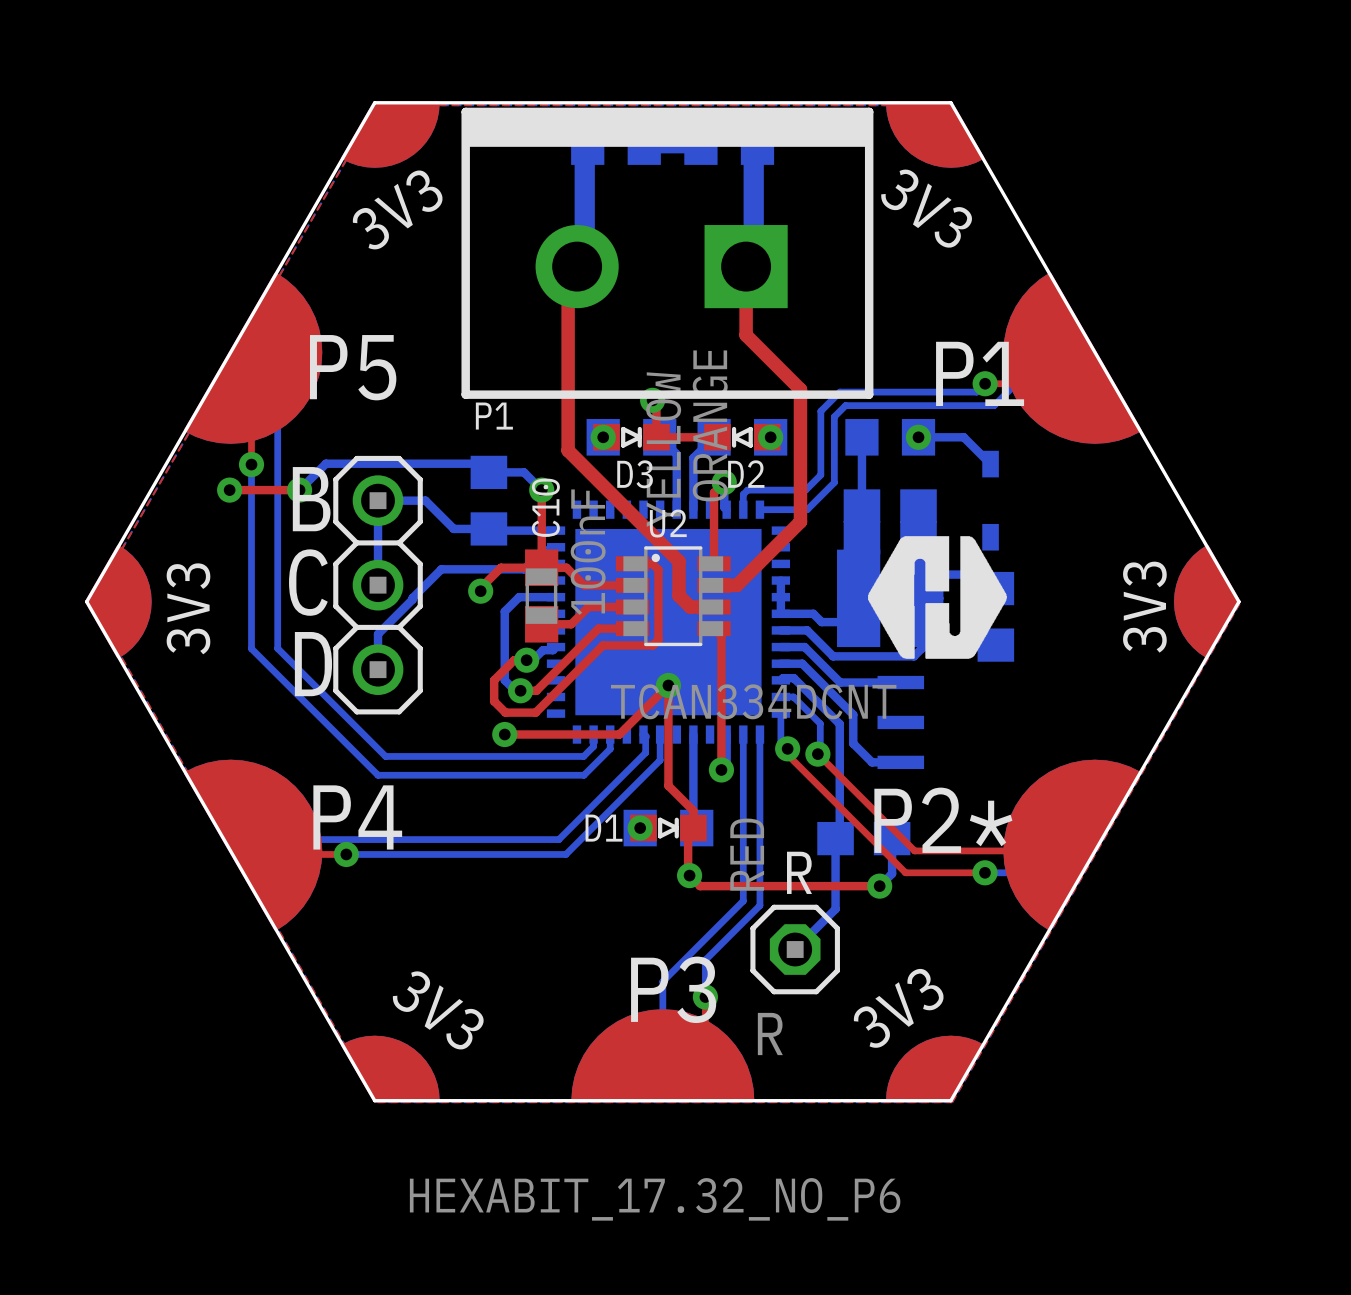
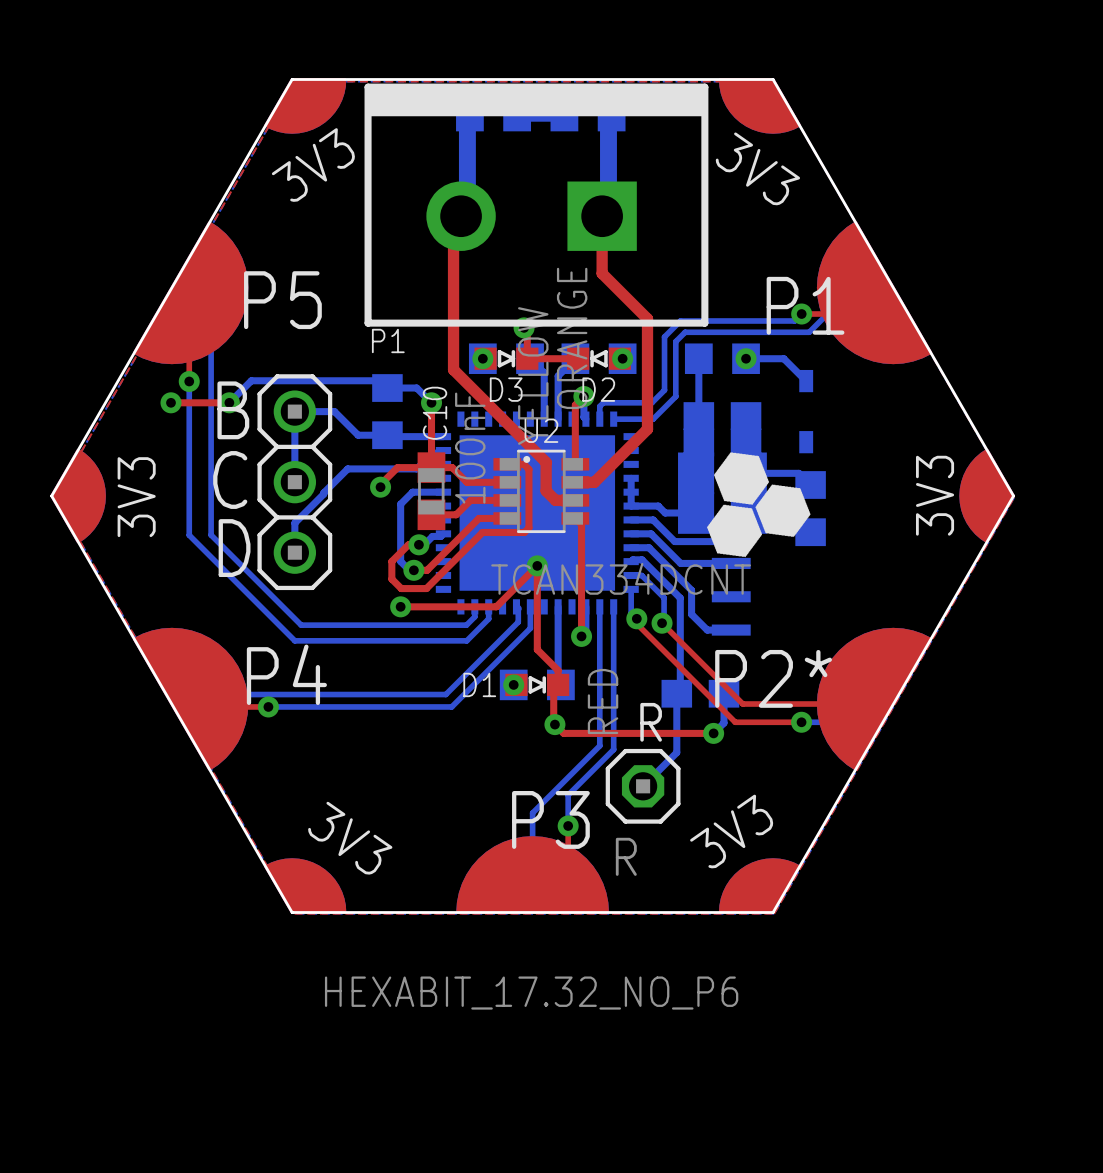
drawing: [868, 536, 1007, 659] -> none
drawing: none -> [707, 452, 811, 558]

